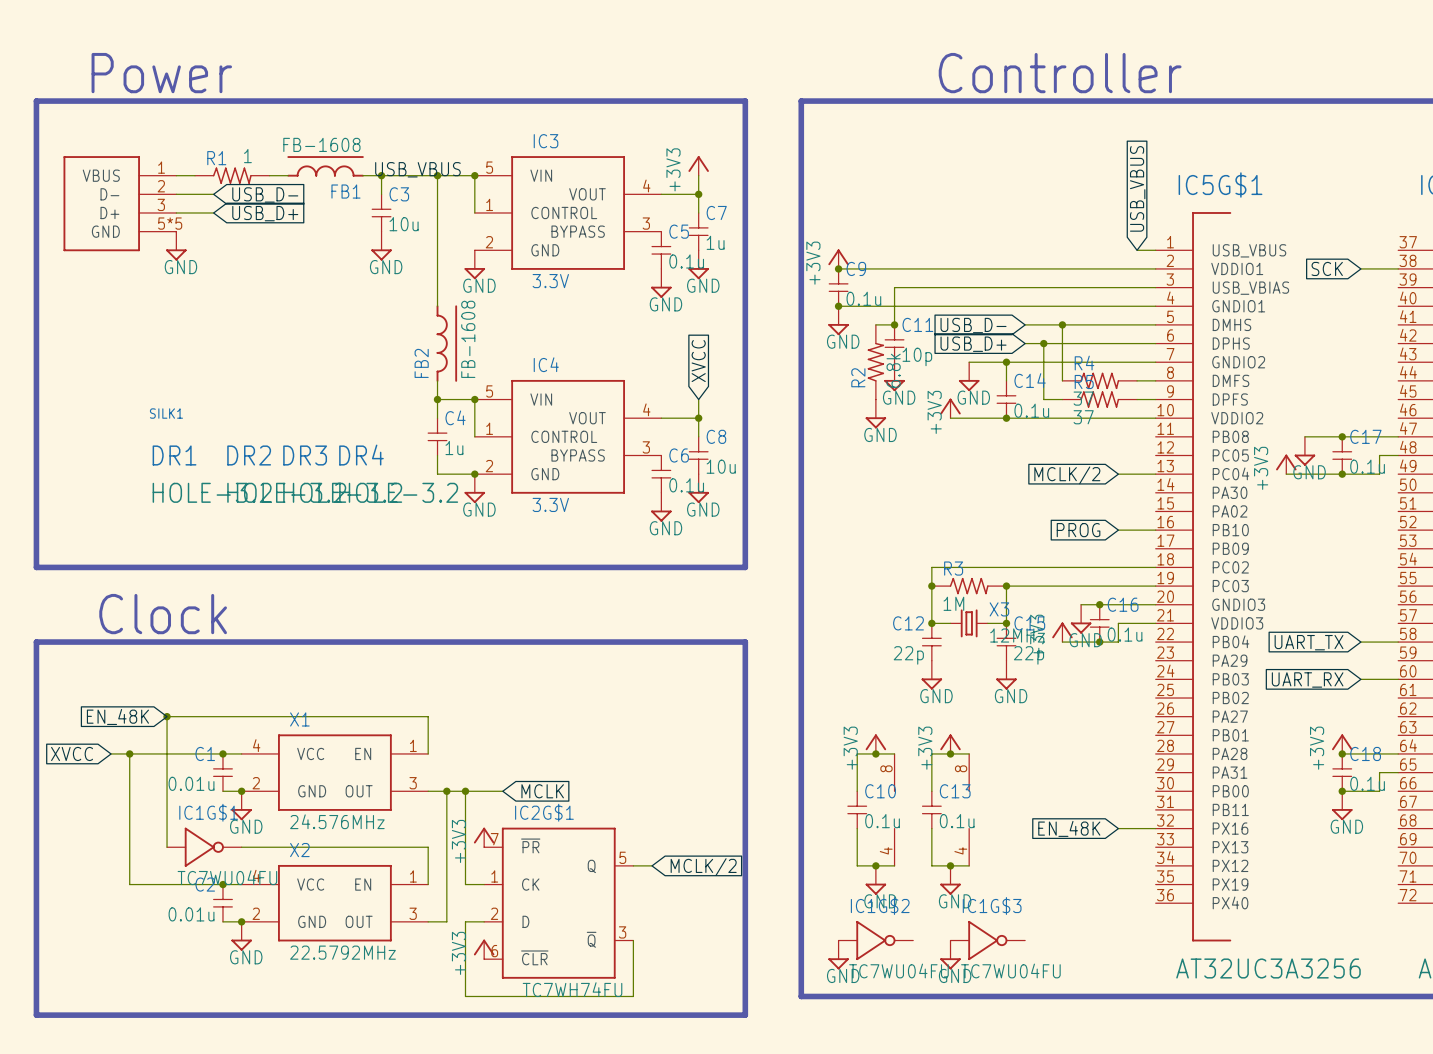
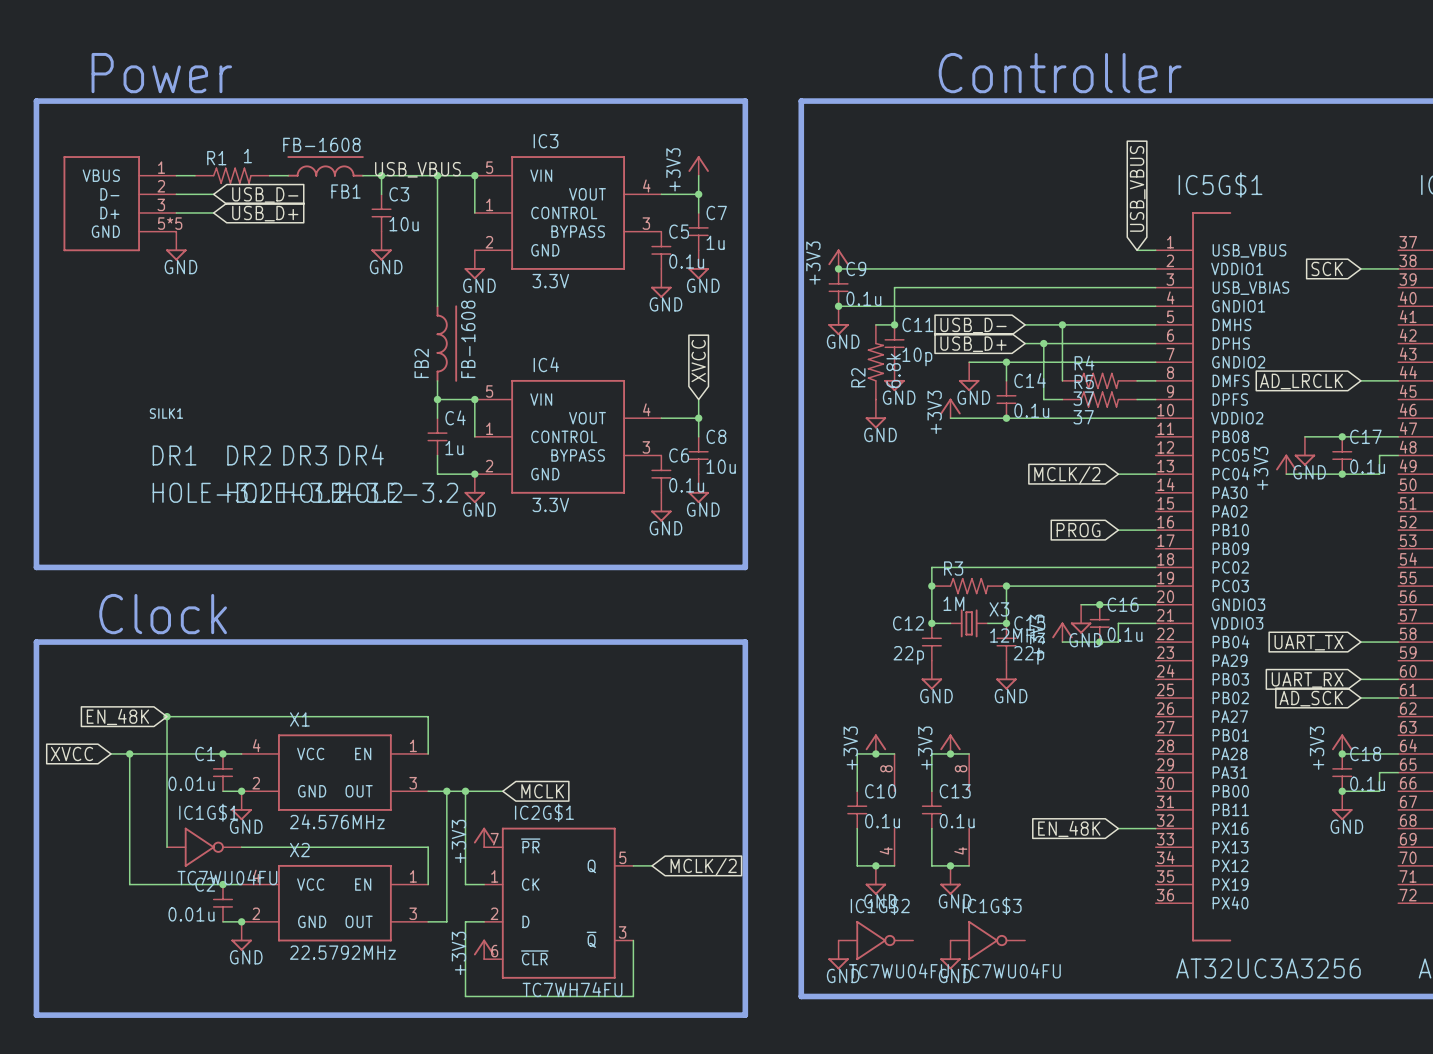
wire: none -> (1360, 380) (1398, 380)
global label: none -> AD_LRCLK (1301, 381)
global label: none -> AD_SCK (1311, 698)
wire: none -> (1360, 698) (1398, 698)

